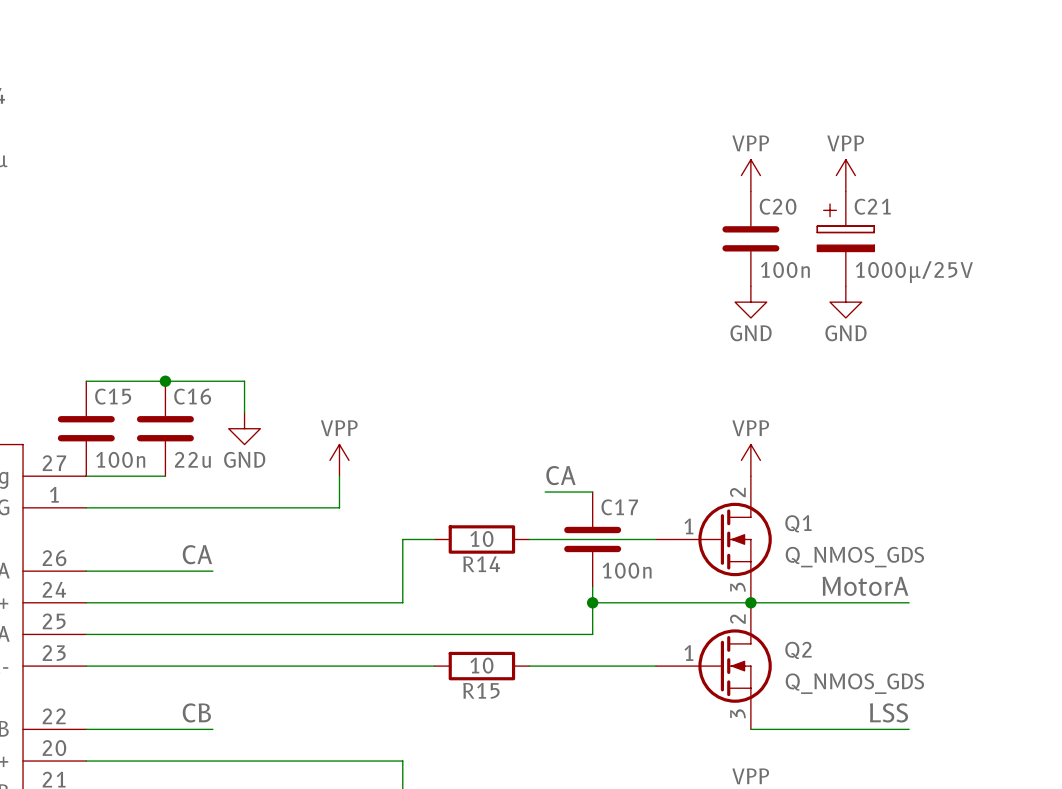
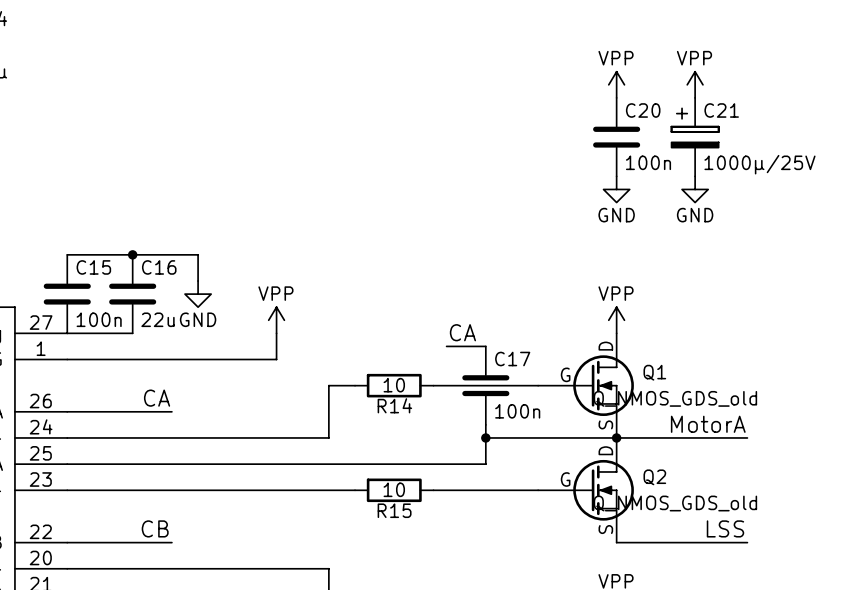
Q1 pin number: 2 (737, 492) -> D (605, 346)
Q1 pin number: 1 (688, 526) -> G (565, 374)
Q1 value: Q_NMOS_GDS (854, 557) -> Q_NMOS_GDS_old (675, 398)
Q1 pin number: 3 (737, 587) -> S (605, 424)
Q2 pin number: 2 (737, 619) -> D (605, 450)
Q2 pin number: 1 (688, 653) -> G (565, 479)
Q2 value: Q_NMOS_GDS (854, 683) -> Q_NMOS_GDS_old (675, 503)
Q2 pin number: 3 (737, 713) -> S (605, 529)

